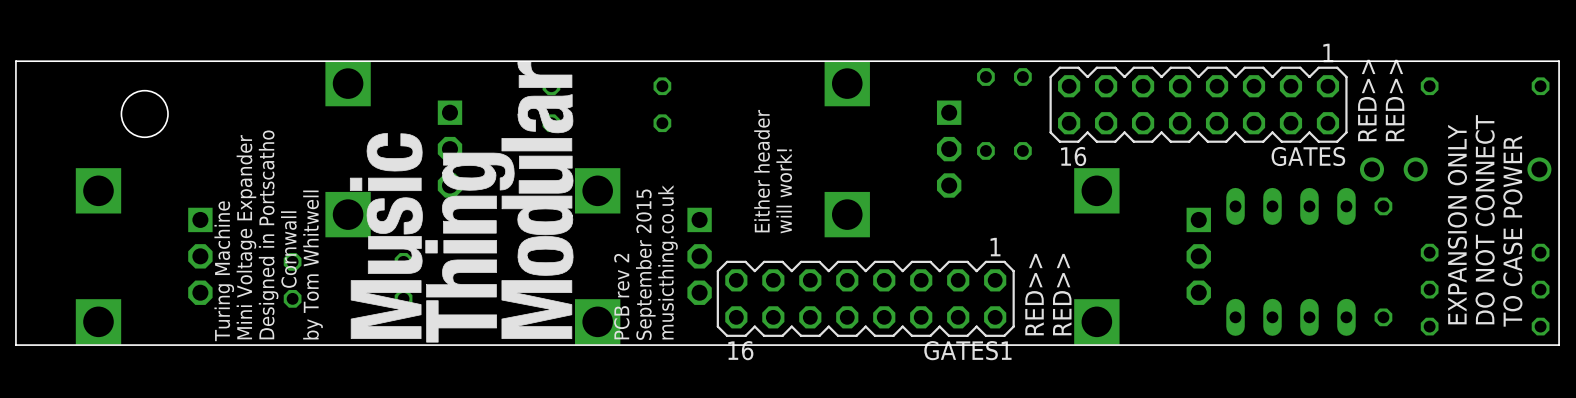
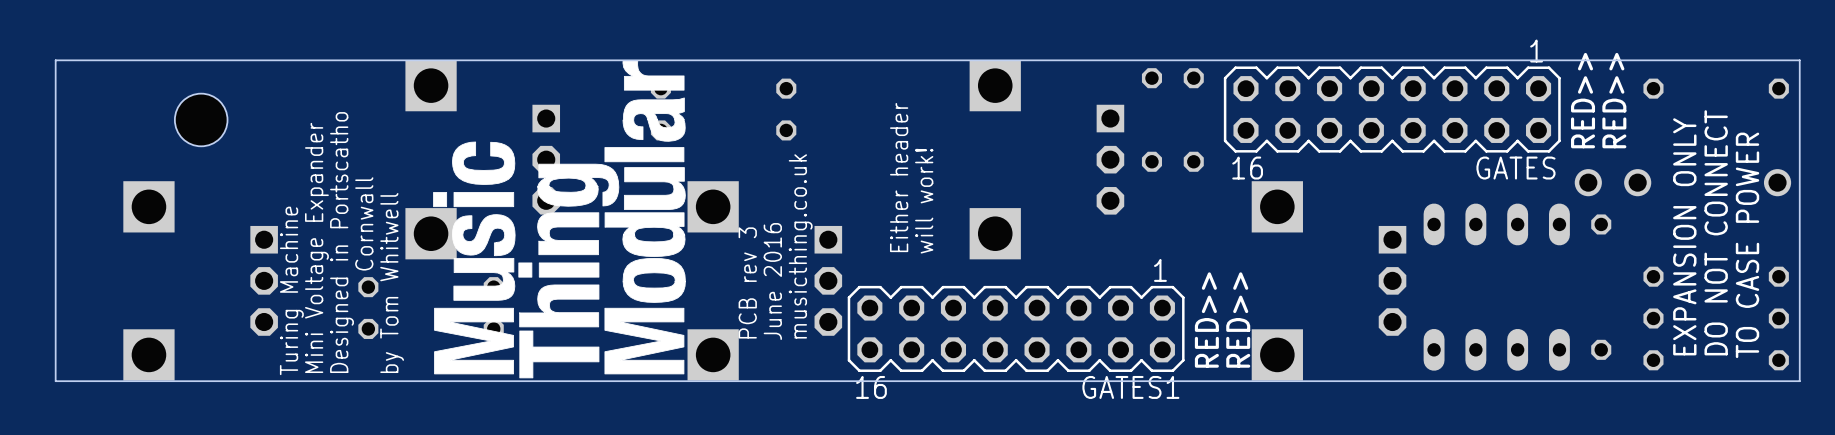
text position: musicthing.co.uk (667, 262) -> musicthing.co.uk (800, 246)
text: September 2015 (645, 264) -> none
text: none -> June 2016 (772, 281)
text: PCB rev 2 (621, 296) -> PCB rev 3 (747, 282)

